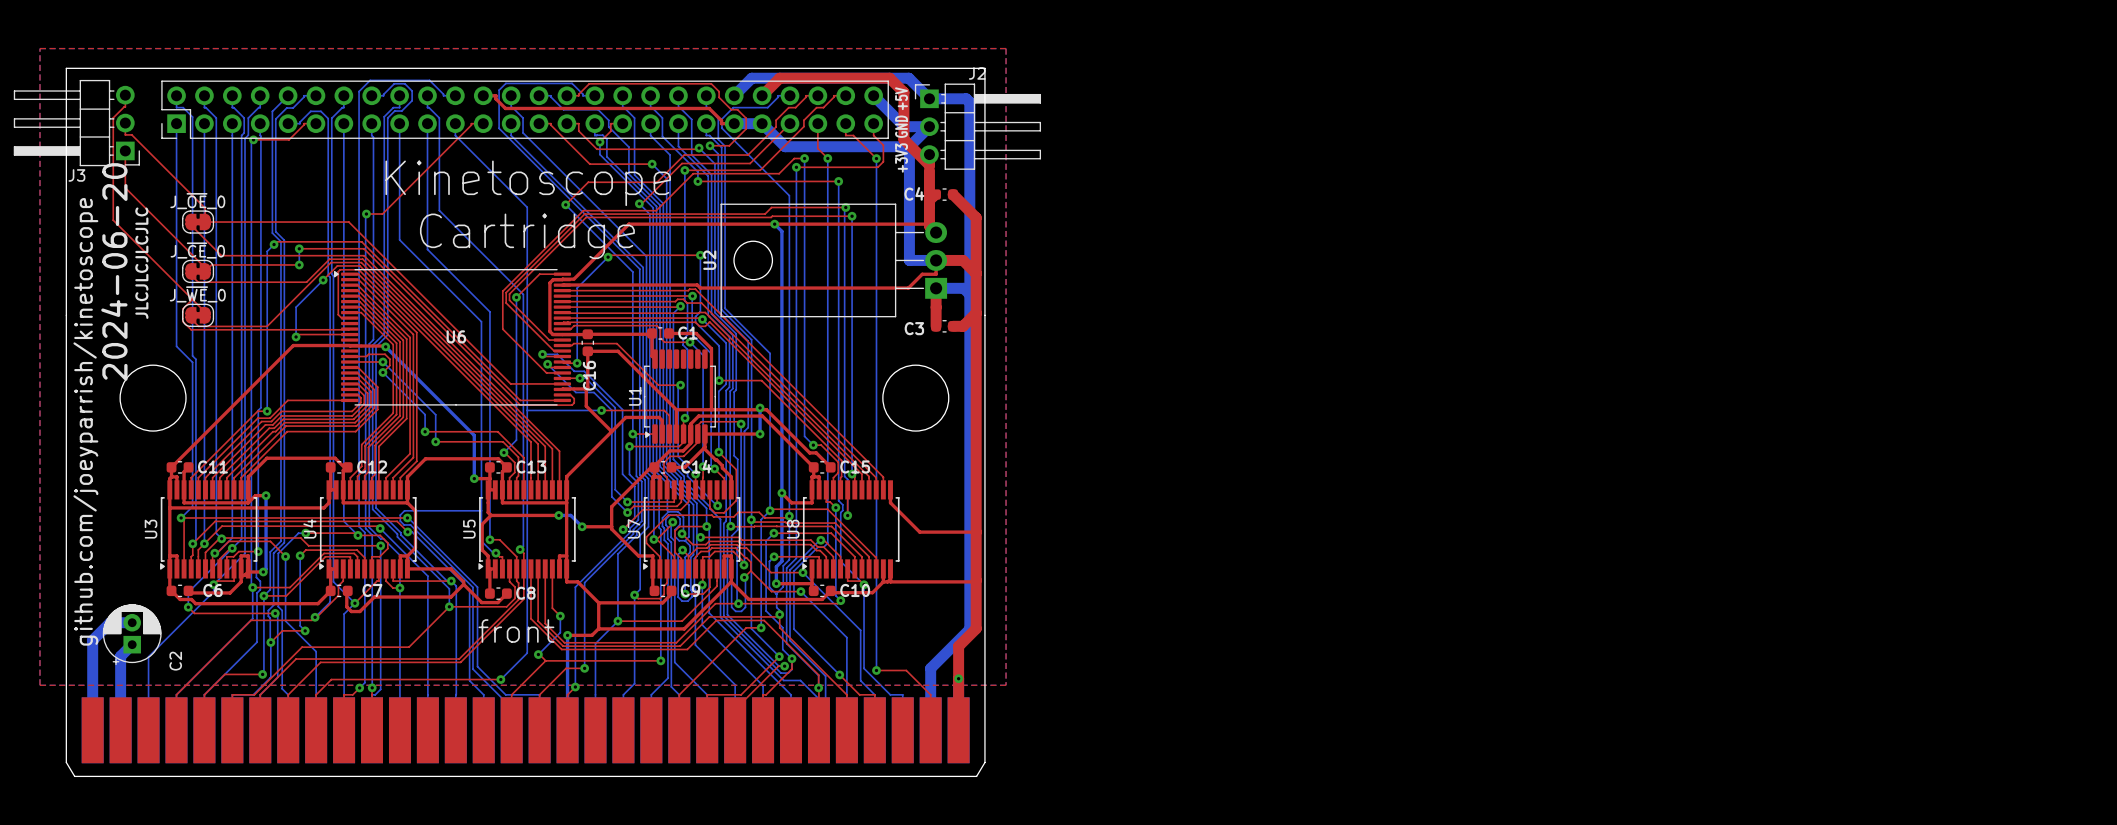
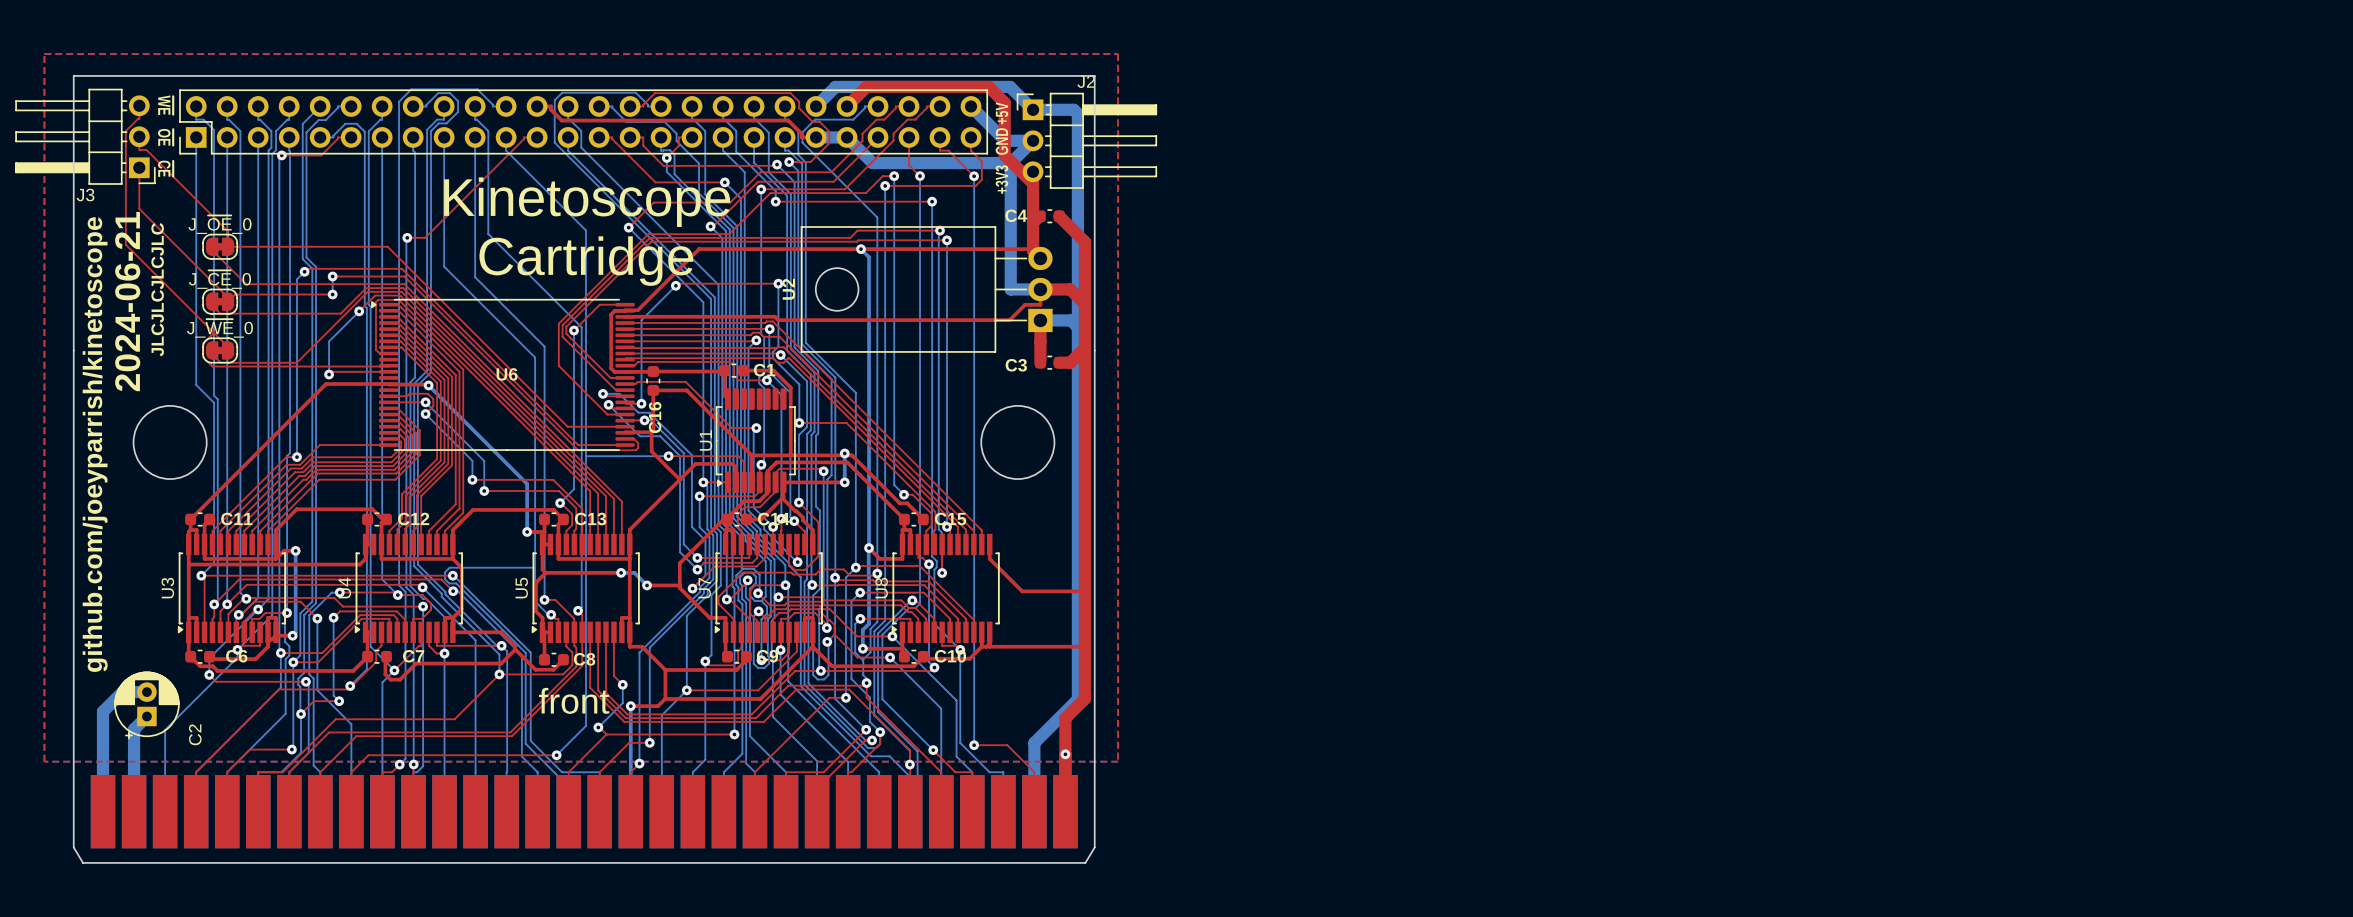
text: none -> ~{WE} (165, 105)
text: none -> ~{OE} (165, 137)
text: none -> ~{CE} (165, 168)
text: 2024-06-20 (114, 271) -> 2024-06-21 (127, 301)

